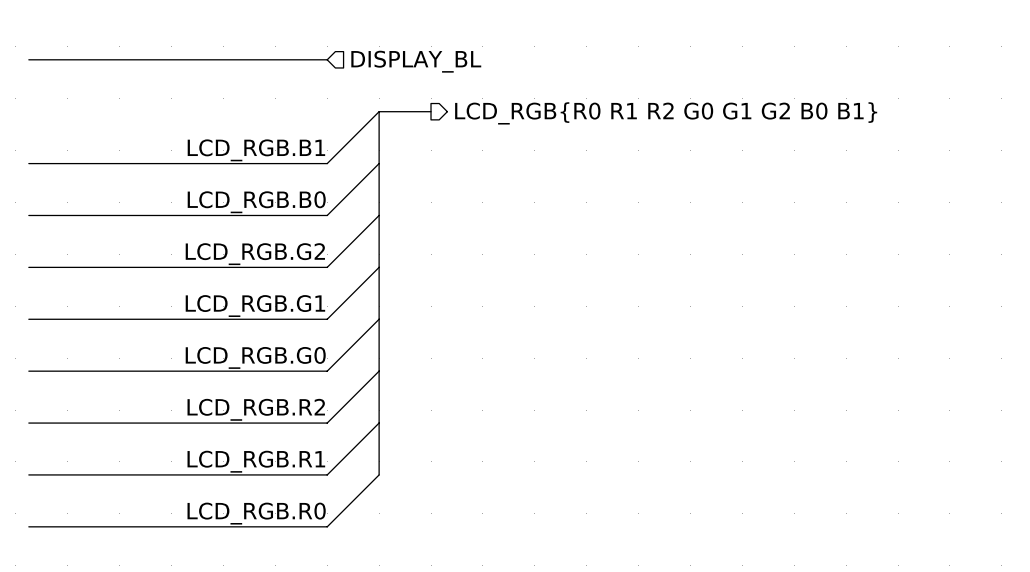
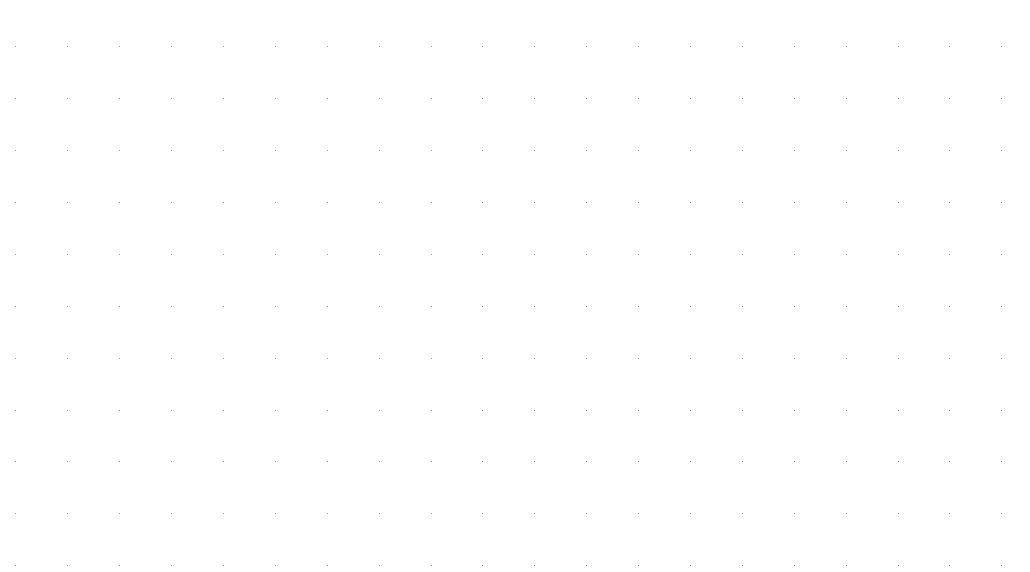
wire: (28, 59) (327, 59) -> none
hierarchical label: DISPLAY_BL (416, 61) -> none
wire: (379, 111) (327, 163) -> none
bus: (431, 111) (379, 111) (379, 474) -> none
hierarchical label: LCD_RGB{R0 R1 R2 G0 G1 G2 B0 B1} (666, 113) -> none
label: LCD_RGB.B1 (256, 150) -> none
wire: (28, 163) (327, 163) -> none
wire: (379, 163) (327, 215) (28, 215) -> none
label: LCD_RGB.B0 (256, 202) -> none
wire: (379, 215) (327, 267) (28, 267) -> none
label: LCD_RGB.G2 (255, 254) -> none
wire: (379, 267) (327, 319) (28, 319) -> none
label: LCD_RGB.G1 (255, 306) -> none
wire: (379, 319) (327, 371) (28, 371) -> none
label: LCD_RGB.G0 (255, 357) -> none
wire: (379, 371) (327, 423) (28, 423) -> none
label: LCD_RGB.R2 (256, 409) -> none
wire: (379, 423) (327, 474) -> none
label: LCD_RGB.R1 (256, 461) -> none
wire: (28, 474) (327, 474) -> none
wire: (379, 474) (327, 526) (28, 526) -> none
label: LCD_RGB.R0 (256, 513) -> none

